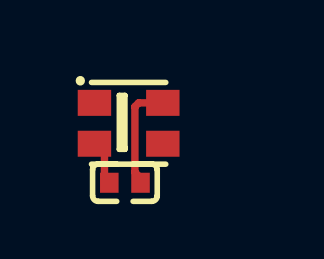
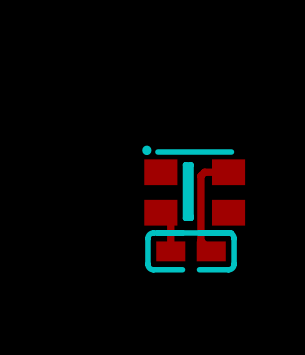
part footprint: [89, 161, 161, 205] -> [145, 230, 237, 273]

